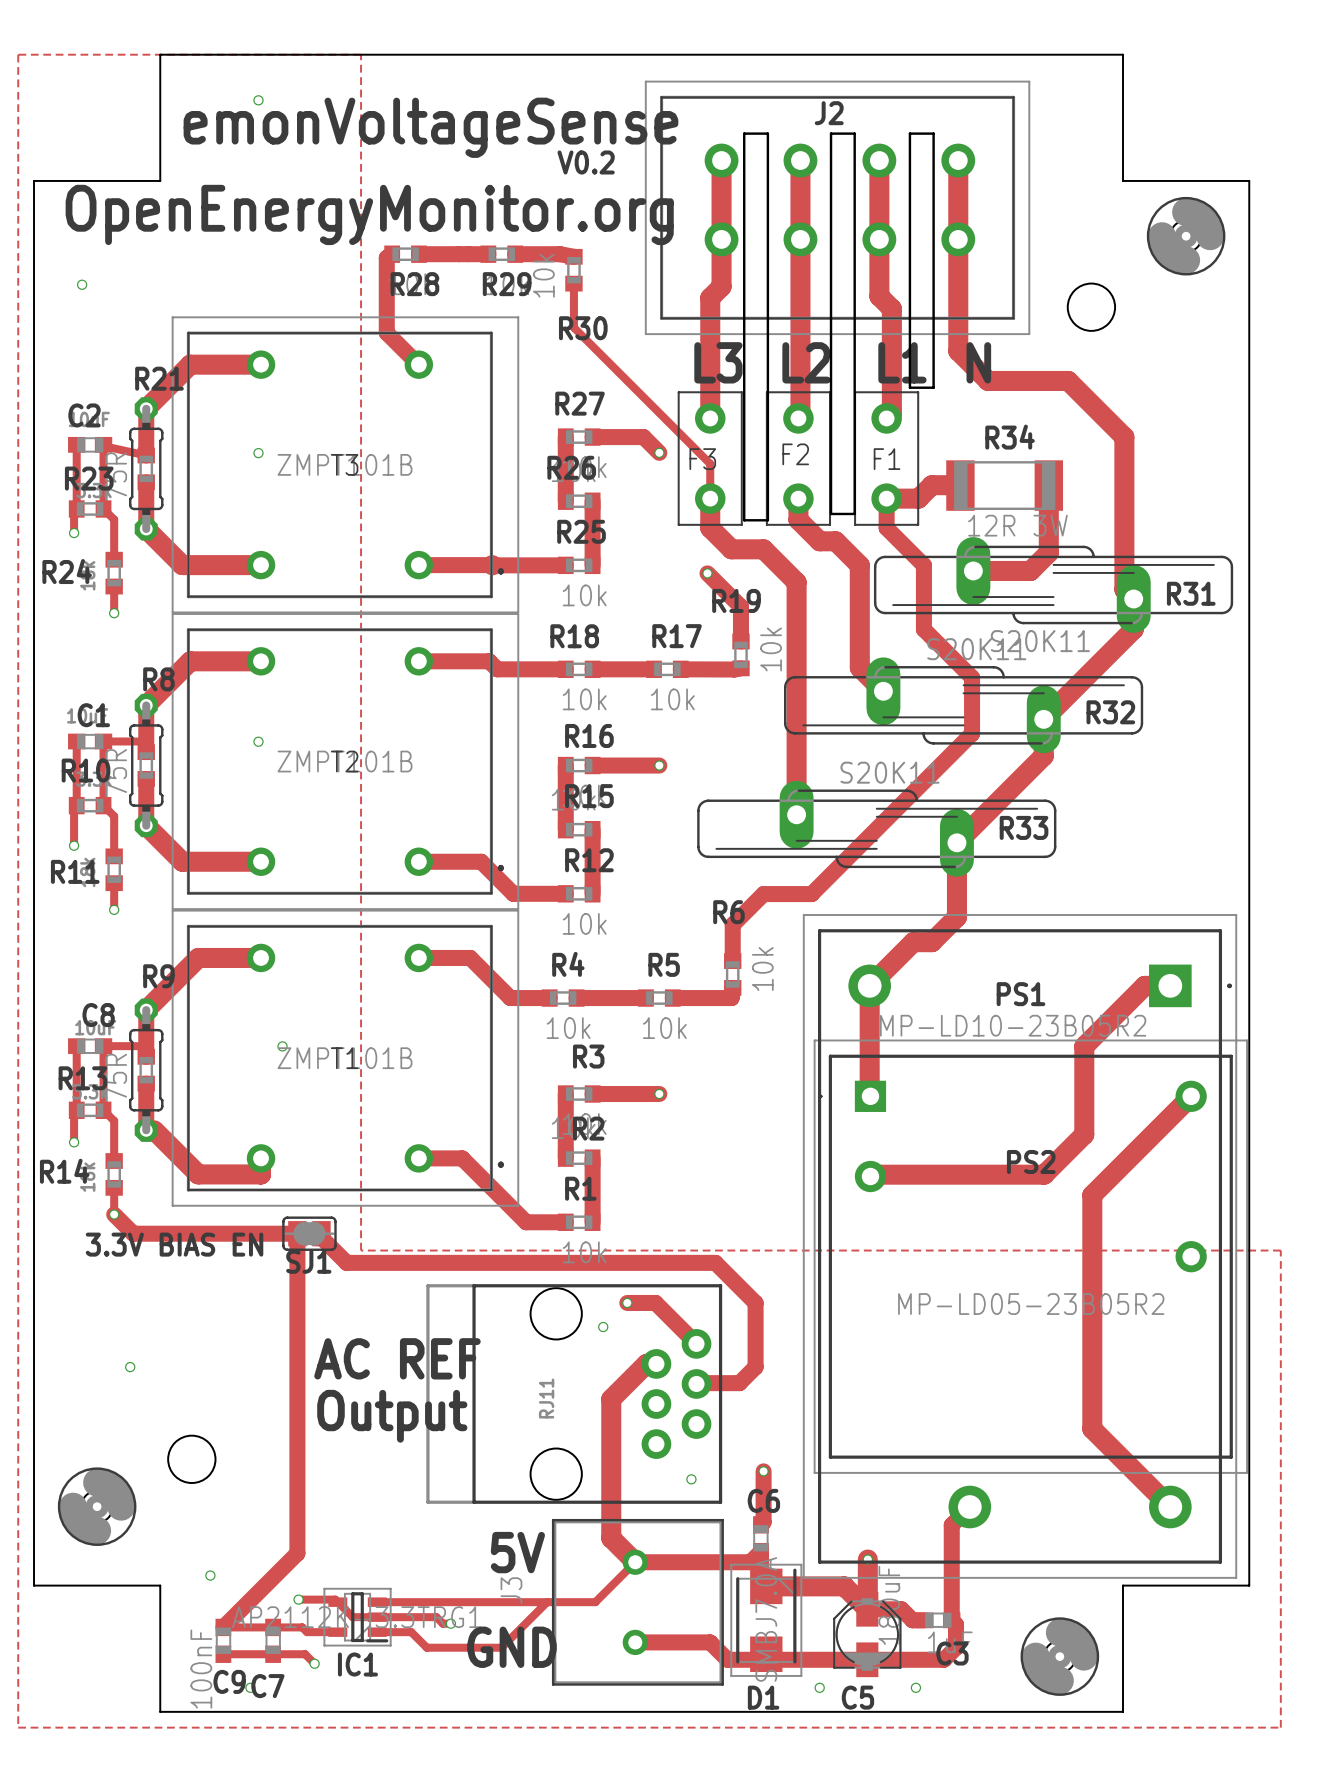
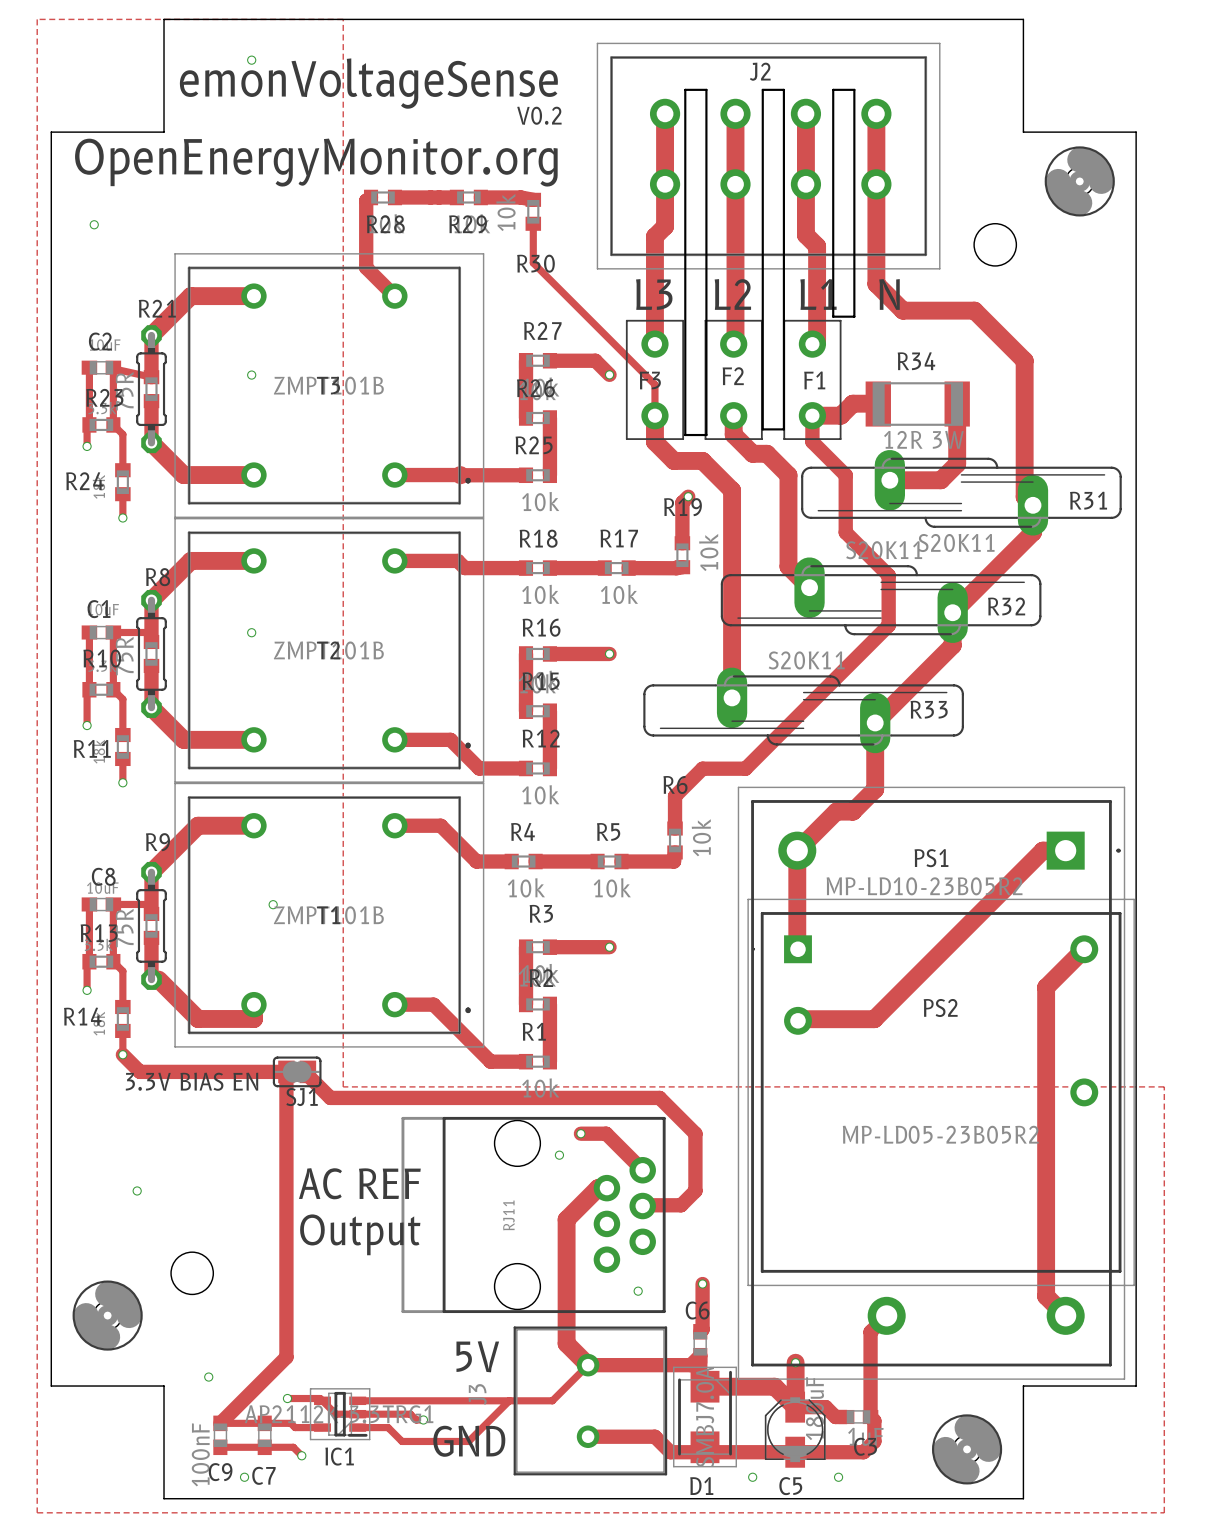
track: (707, 573) (740, 606) -> (688, 496) (682, 502) (682, 512)
via position: (707, 573) -> (688, 496)
track: (1084, 1046) (1084, 1134) (1044, 1174) (956, 1174) -> (988, 904) (874, 1019)
track: (1148, 1139) (1092, 1195) (1092, 1428) (1148, 1485) -> (1046, 987) (1046, 1296)

